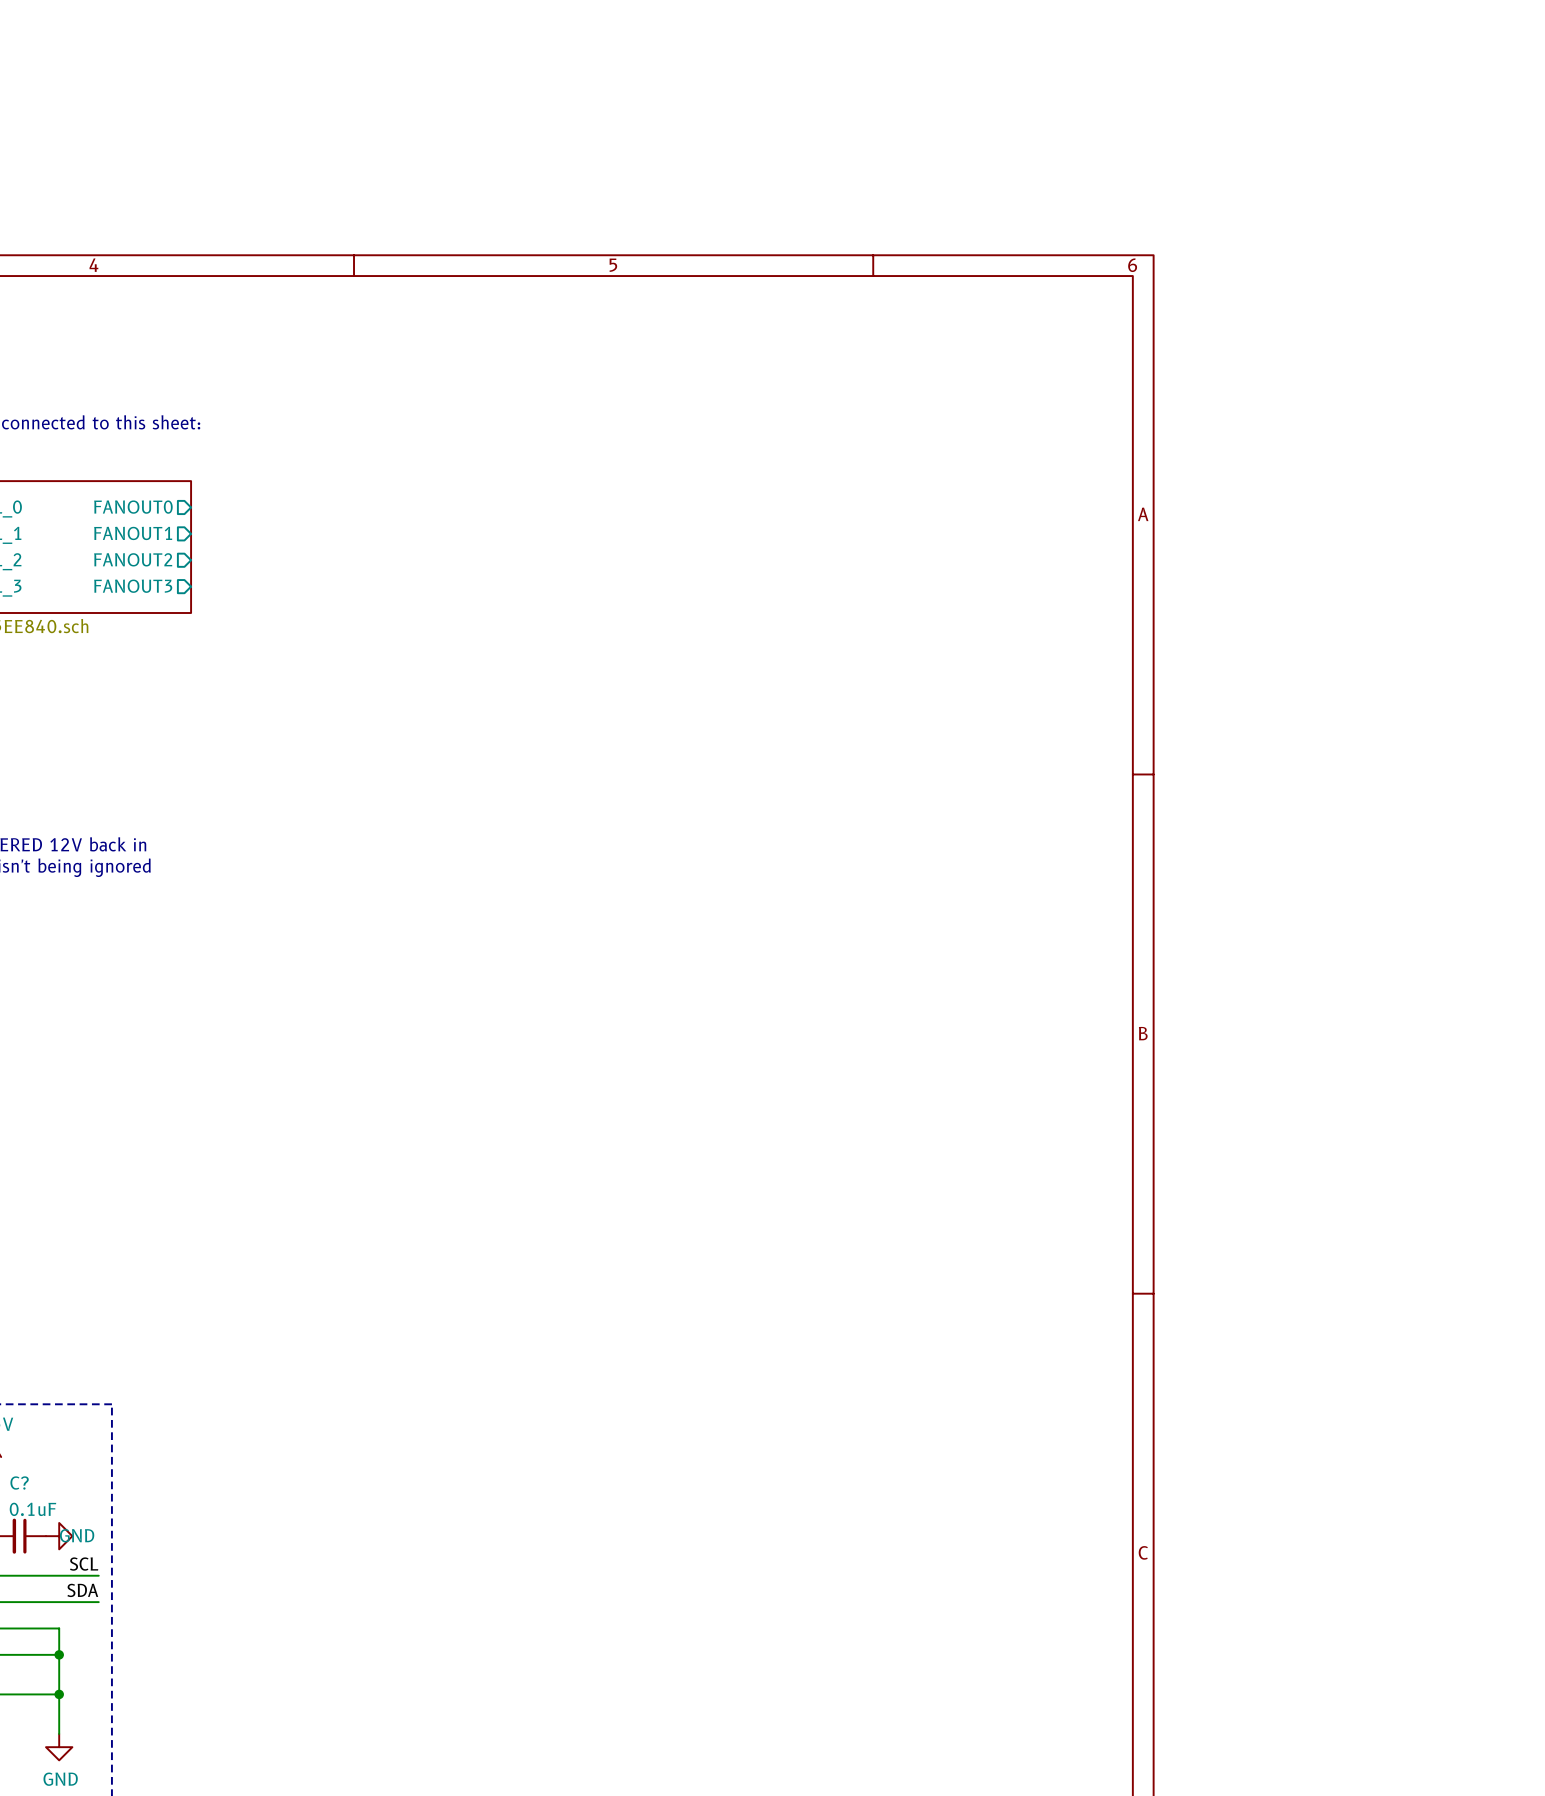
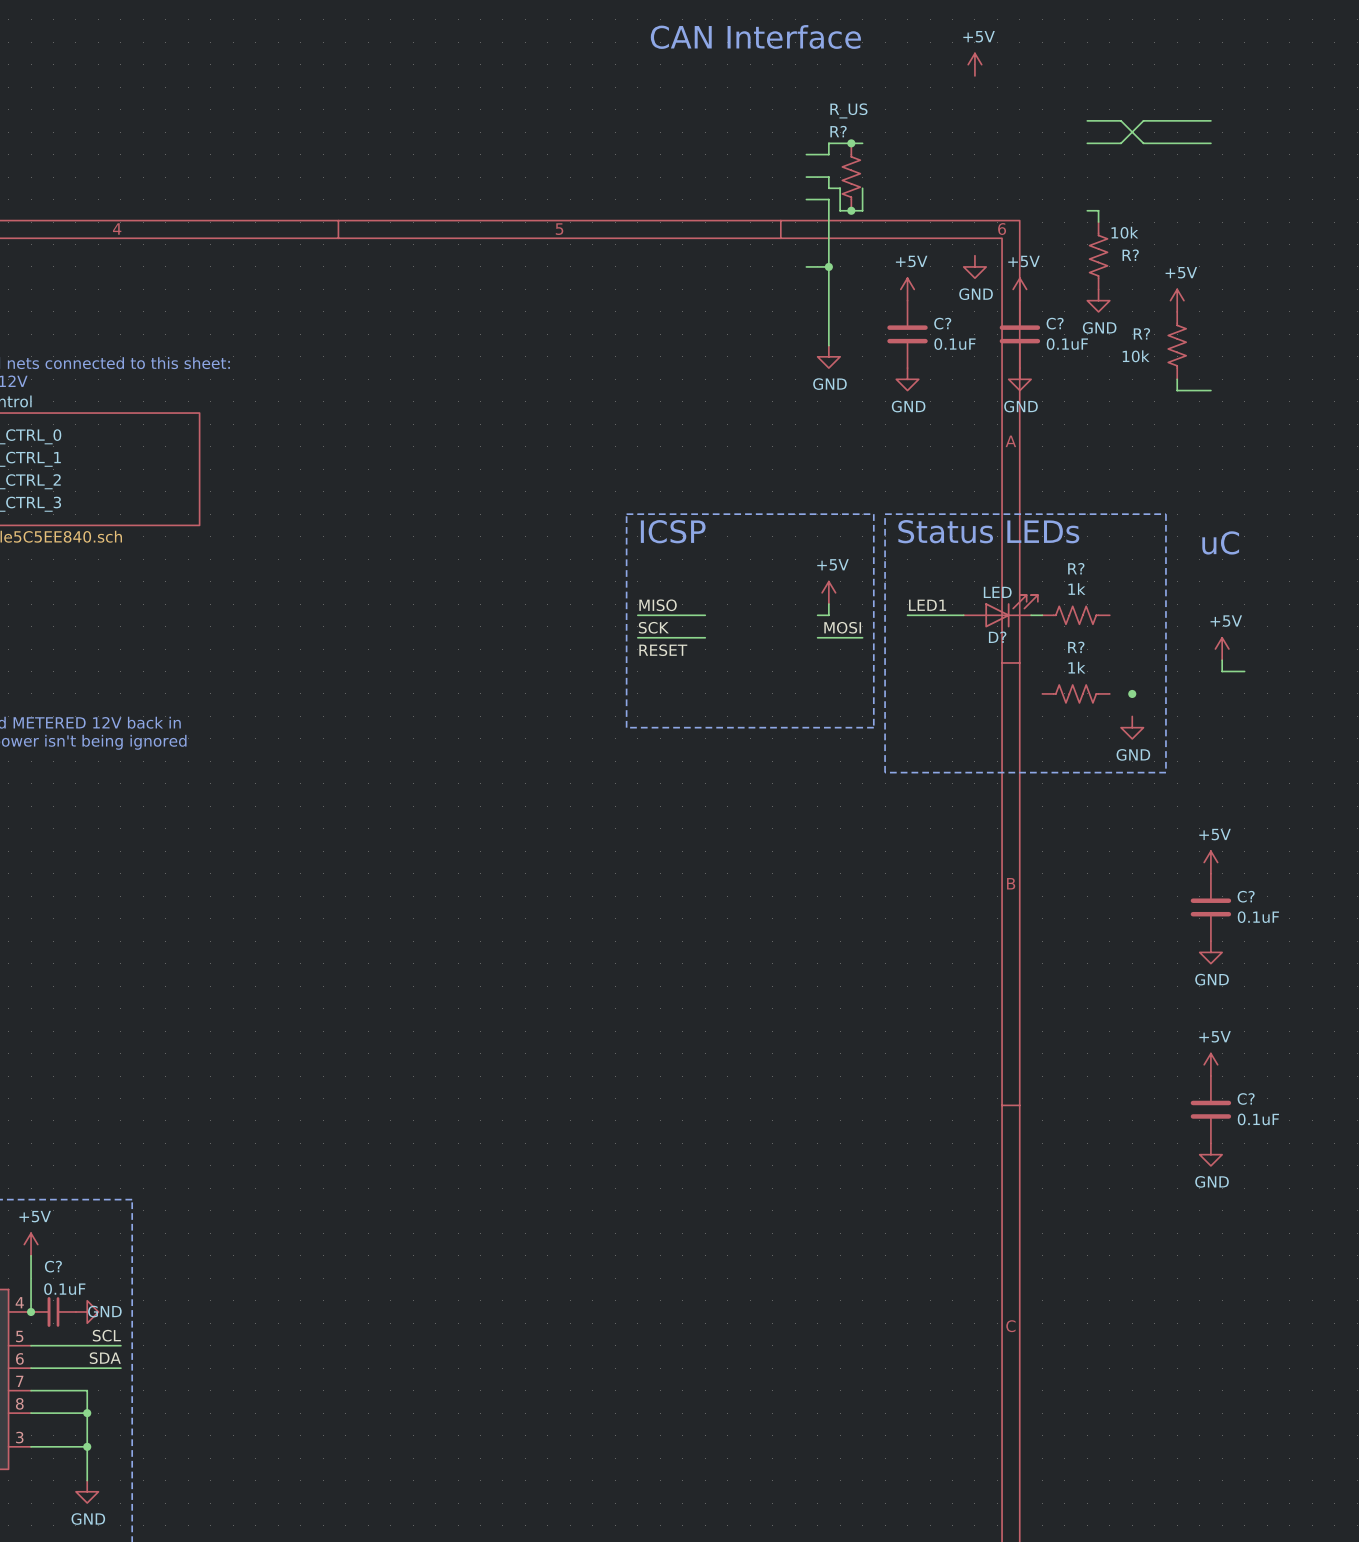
text: none -> CAN Interface (755, 36)
power symbol: none -> +5V (974, 64)
wire: none -> (1087, 120) (1121, 120) (1143, 143) (1210, 143)
wire: none -> (1210, 120) (1143, 120) (1121, 143) (1087, 143)
junction: none -> (851, 143)
wire: none -> (862, 143) (828, 143) (828, 154) (806, 154)
wire: none -> (806, 177) (828, 177) (828, 188) (840, 188) (840, 210) (862, 210) (862, 188)
R?: none -> R_US (851, 177)
wire: none -> (806, 199) (828, 199) (828, 345)
junction: none -> (851, 210)
wire: none -> (1087, 210) (1098, 210) (1098, 222)
R?: none -> 10k (1098, 255)
wire: none -> (806, 266) (828, 266)
junction: none -> (828, 266)
power symbol: none -> GND (974, 266)
power symbol: none -> +5V (907, 289)
power symbol: none -> +5V (1019, 289)
power symbol: none -> GND (1098, 300)
power symbol: none -> +5V (1177, 300)
C?: none -> 0.1uF (907, 334)
C?: none -> 0.1uF (1019, 334)
R?: none -> 10k (1177, 345)
power symbol: none -> GND (828, 356)
power symbol: none -> GND (907, 379)
power symbol: none -> GND (1019, 379)
wire: none -> (1177, 379) (1177, 390) (1210, 390)
sheet pin: FANOUT0 (133, 507) -> none
sheet pin: FANOUT1 (133, 533) -> none
sheet pin: FANOUT2 (133, 559) -> none
sheet pin: FANOUT3 (133, 586) -> none
line: none -> (626, 514) (626, 727) (873, 727) (873, 514) (626, 514)
line: none -> (885, 514) (1165, 514) (1165, 772) (885, 772) (885, 514)
text: none -> ICSP (673, 531)
text: none -> Status LEDs (988, 531)
text: none -> uC (1220, 542)
power symbol: none -> +5V (828, 592)
wire: none -> (828, 604) (828, 615) (817, 615)
label: none -> MISO (658, 605)
label: none -> LED1 (927, 605)
D?: none -> LED (1000, 611)
wire: none -> (637, 615) (705, 615)
wire: none -> (907, 615) (963, 615)
wire: none -> (1031, 615) (1042, 615)
R?: none -> 1k (1076, 615)
label: none -> SCK (653, 627)
label: none -> MOSI (842, 627)
wire: none -> (637, 637) (705, 637)
wire: none -> (817, 637) (862, 637)
power symbol: none -> +5V (1222, 649)
label: none -> RESET (663, 650)
wire: none -> (1222, 660) (1222, 671) (1244, 671)
R?: none -> 1k (1076, 693)
junction: none -> (1132, 693)
power symbol: none -> GND (1132, 727)
power symbol: none -> +5V (1210, 862)
C?: none -> 0.1uF (1210, 907)
power symbol: none -> GND (1210, 952)
power symbol: none -> +5V (1210, 1064)
C?: none -> 0.1uF (1210, 1109)
power symbol: none -> GND (1210, 1154)

